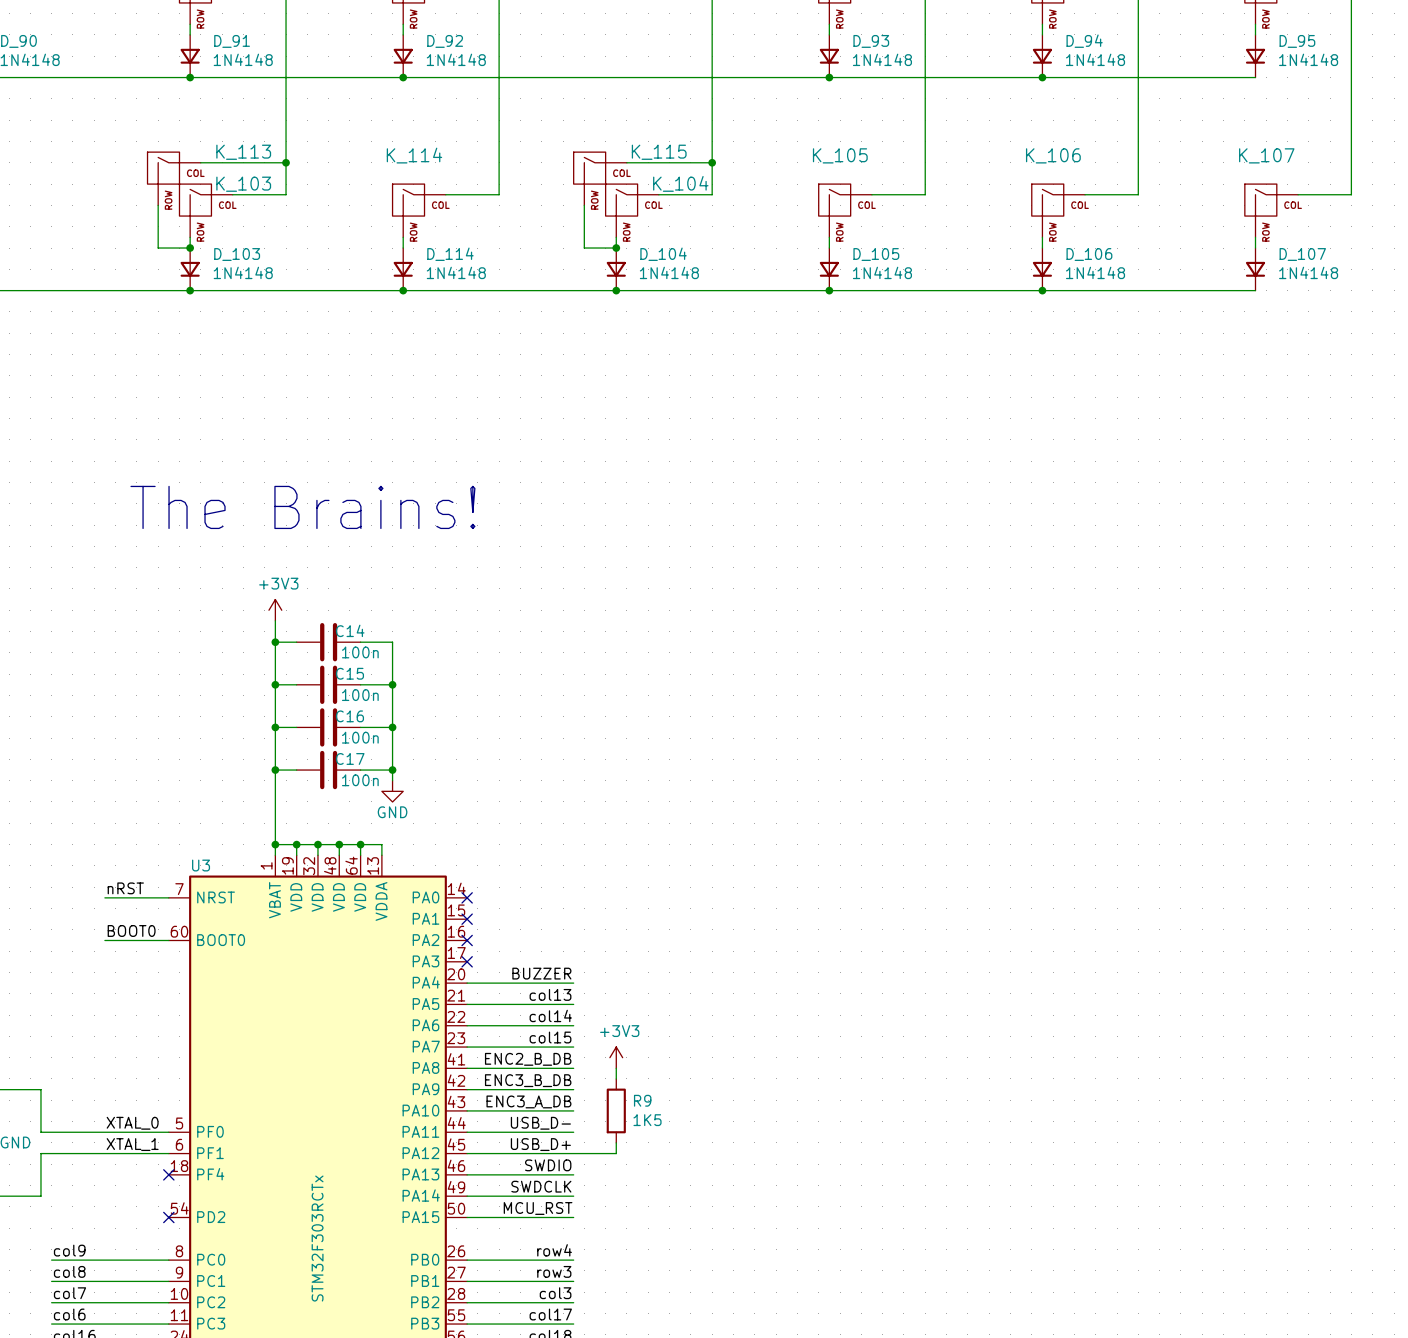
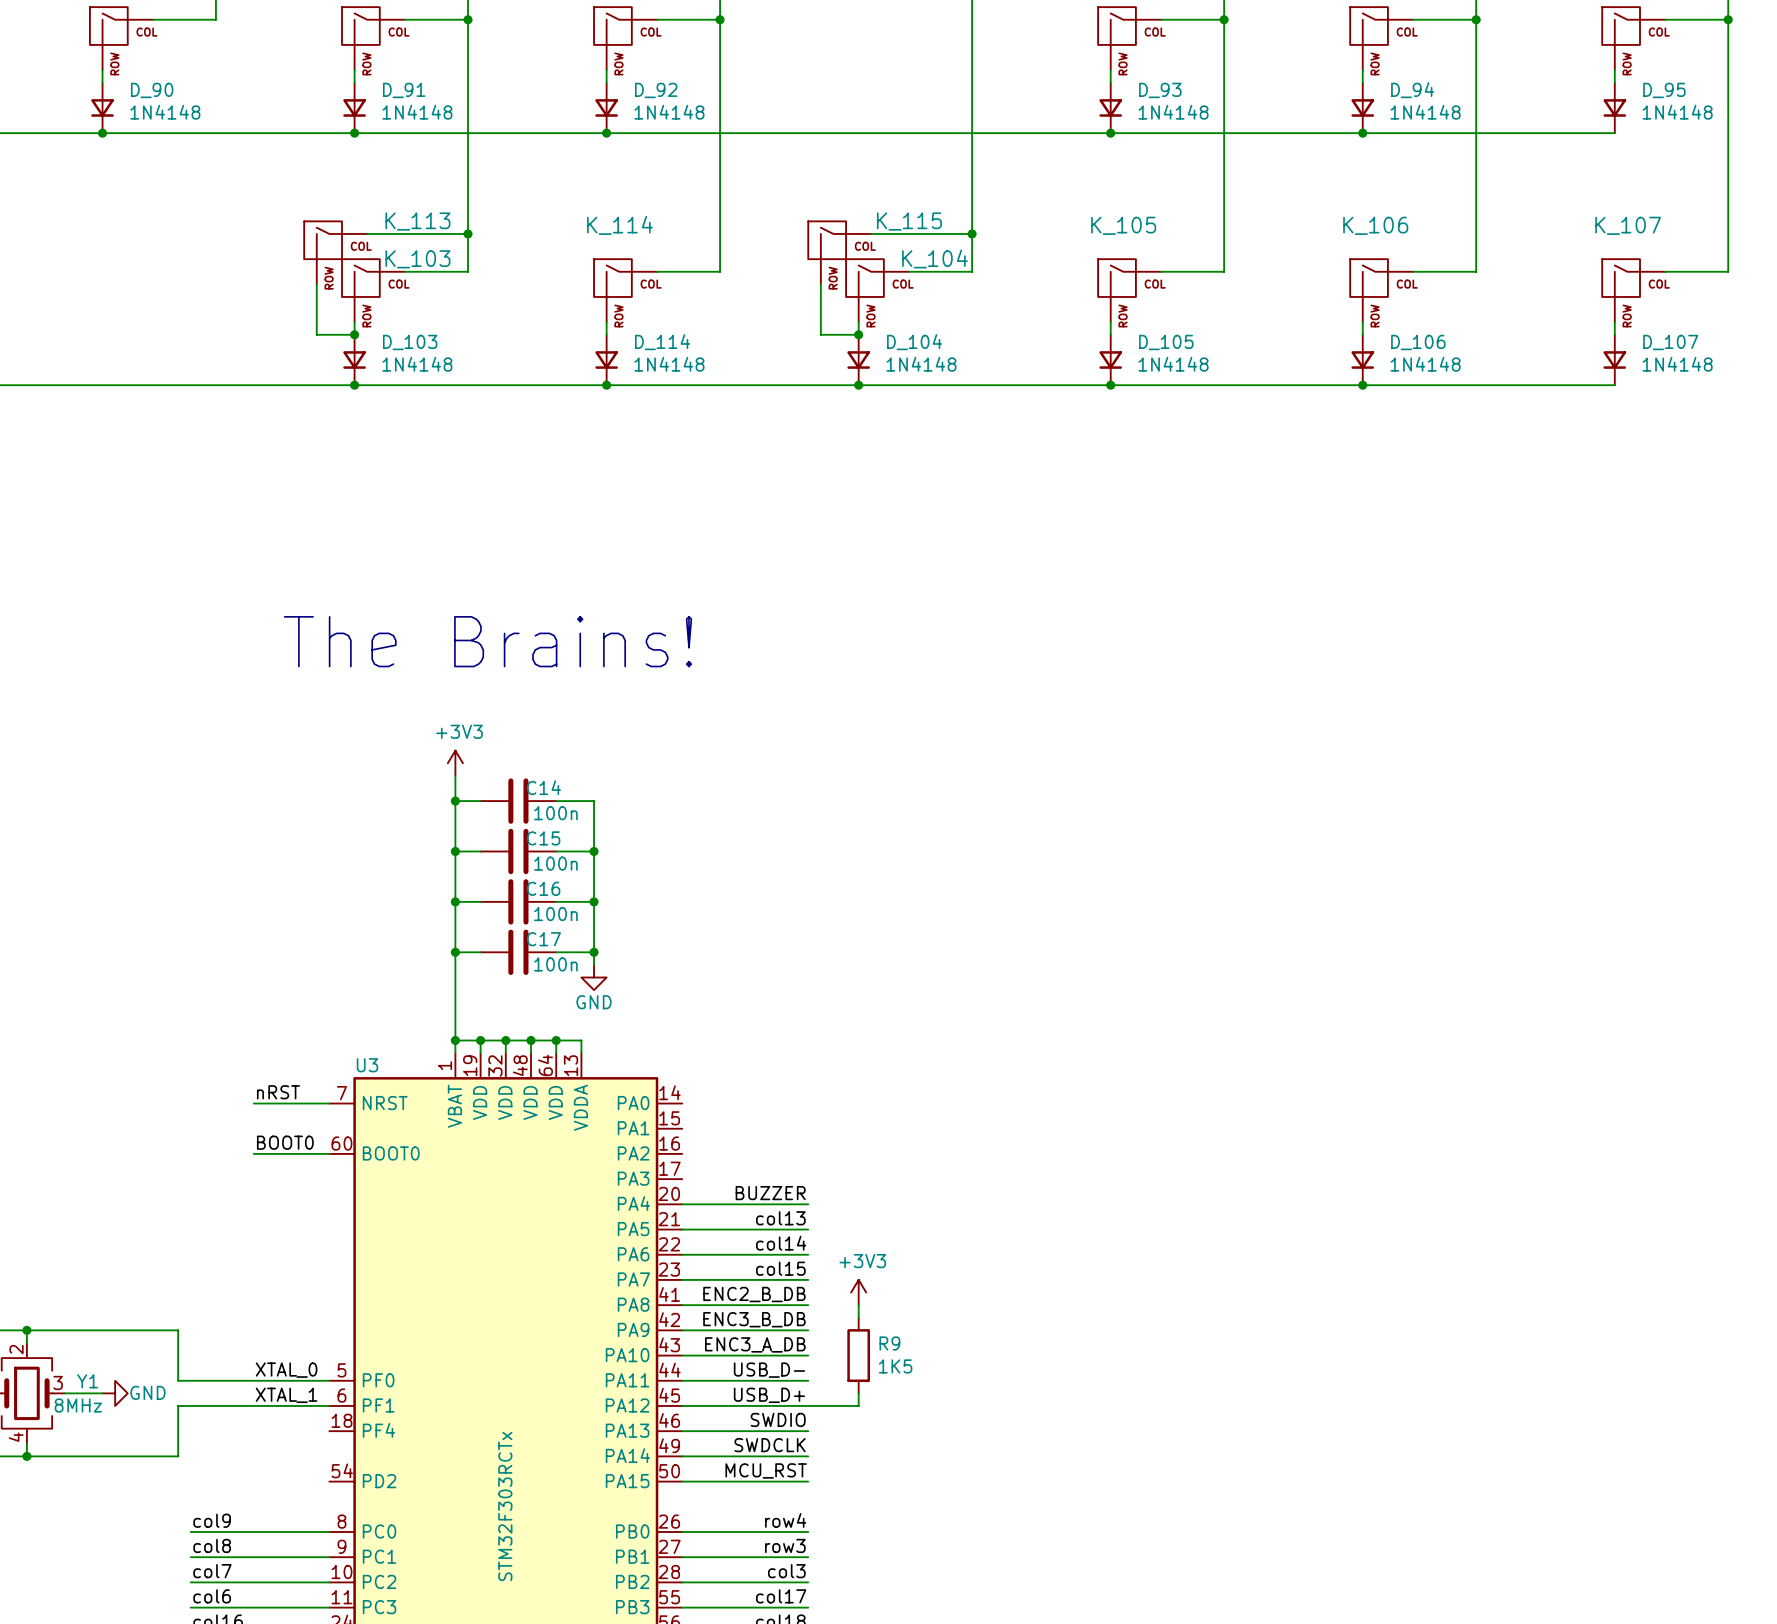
no-connect mark: (467, 897) -> none
no-connect mark: (467, 919) -> none
no-connect mark: (467, 940) -> none
no-connect mark: (467, 961) -> none
no-connect mark: (168, 1174) -> none
no-connect mark: (168, 1217) -> none

